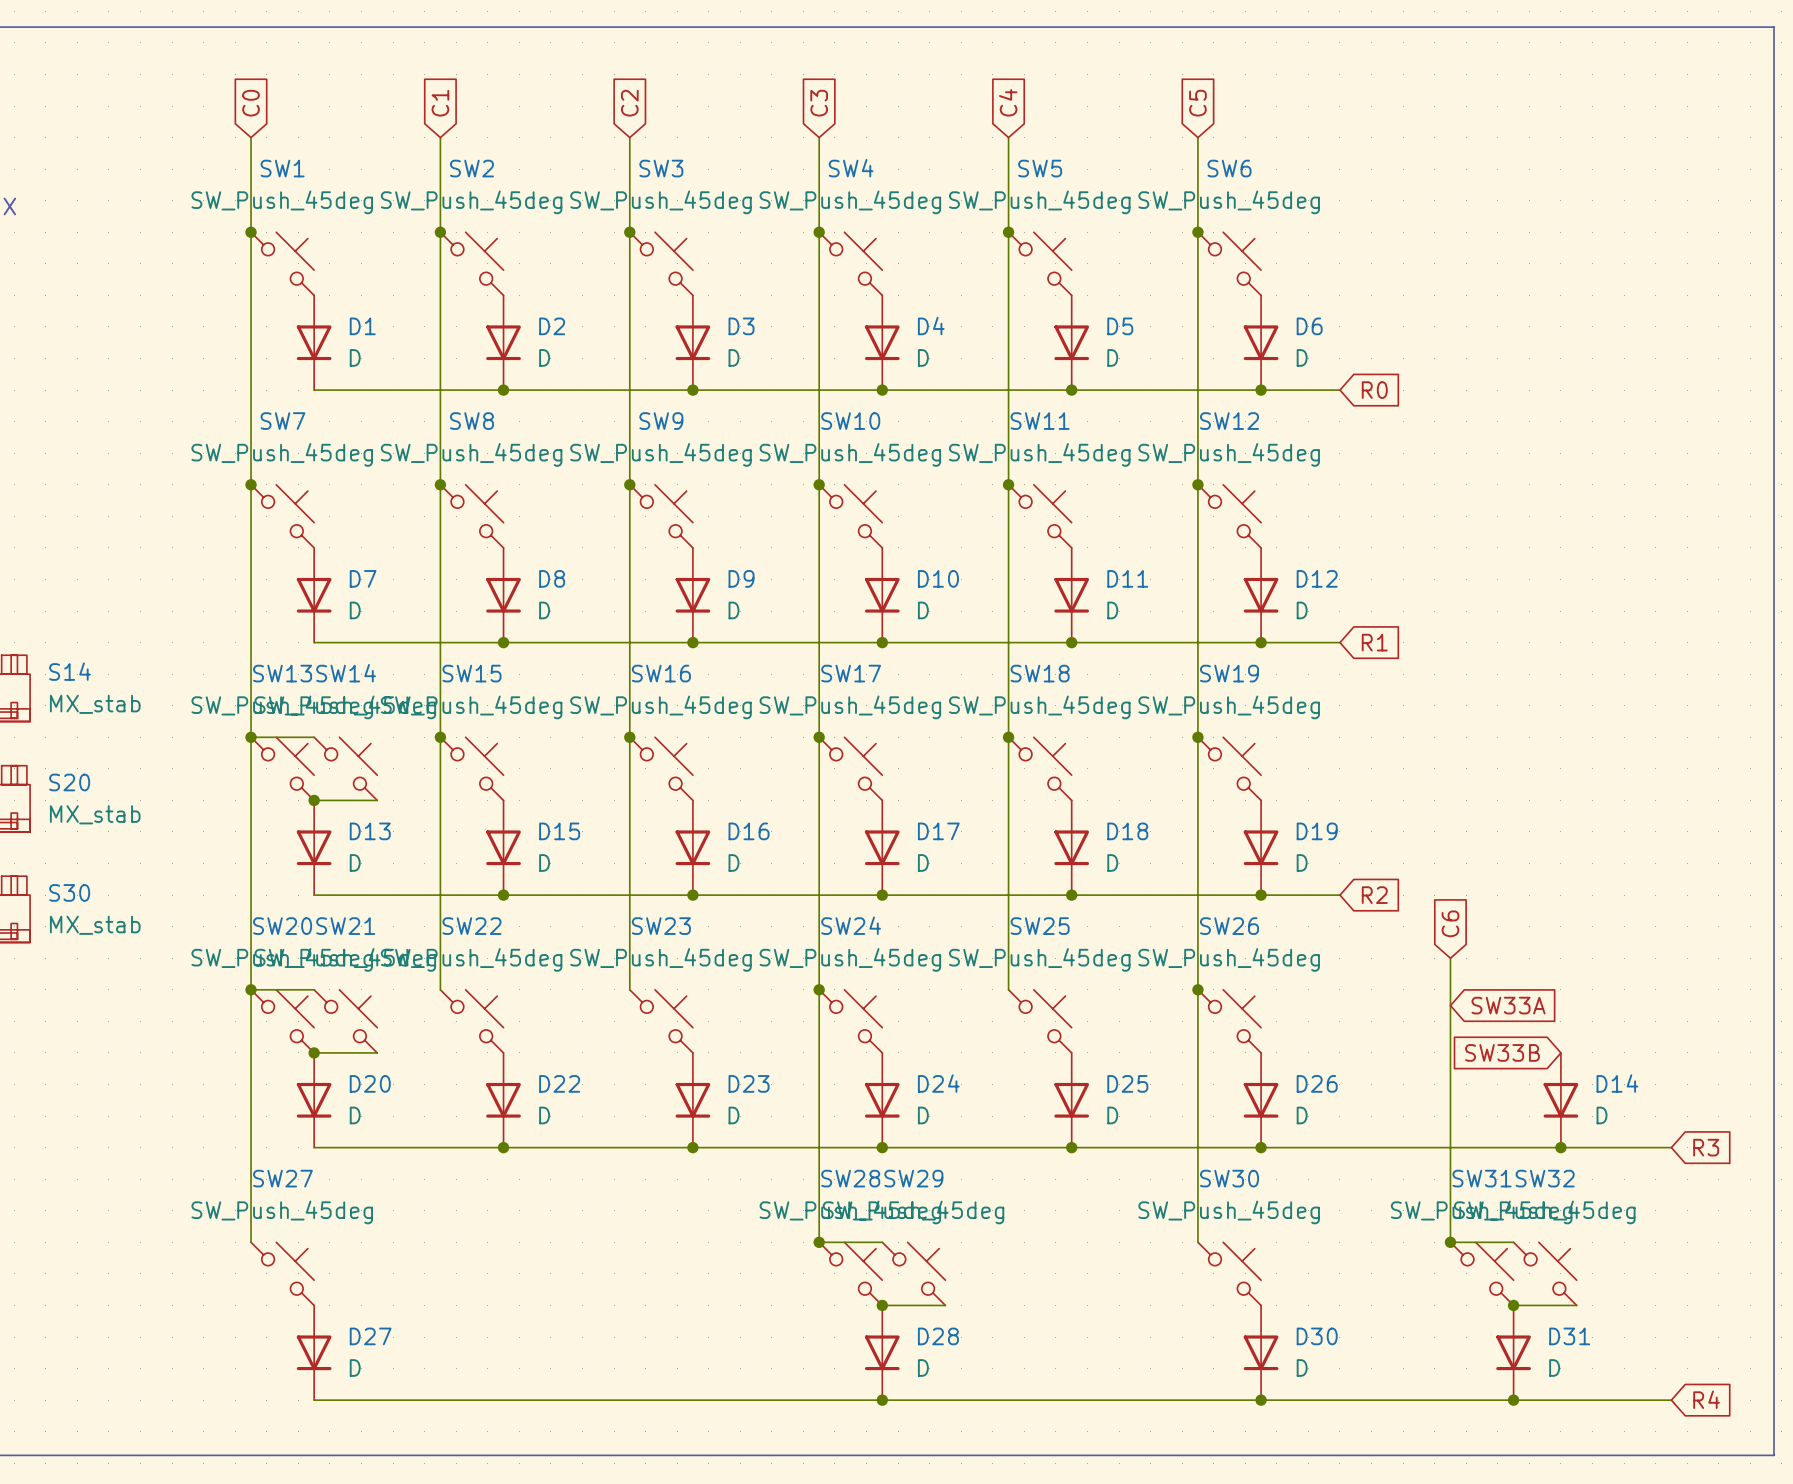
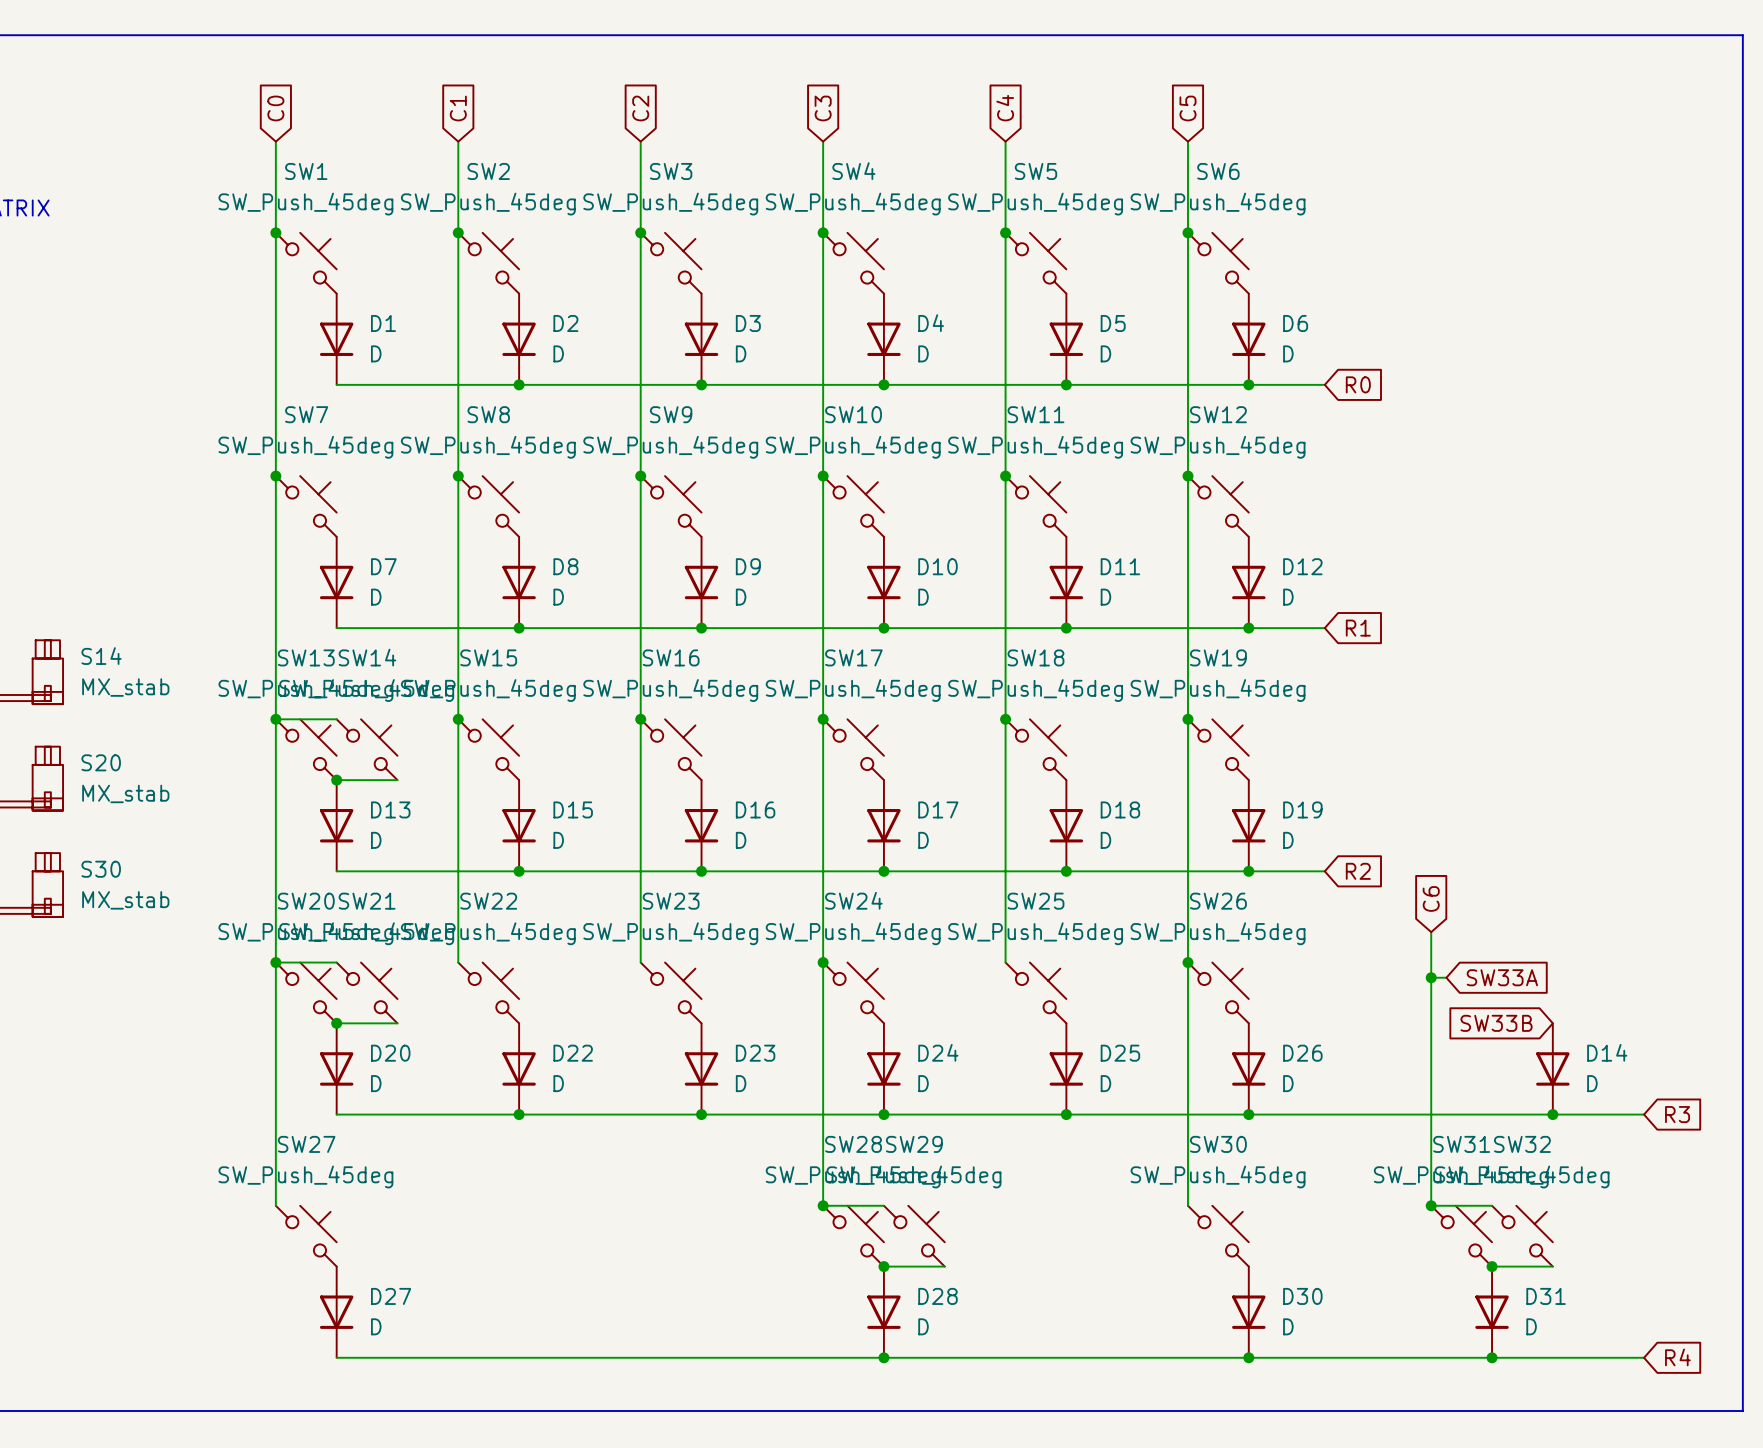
wire: none -> (1431, 977) (1446, 977)
junction: none -> (1431, 977)
global label position: SW33A (1508, 1005) -> SW33A (1502, 977)
global label position: SW33B (1502, 1052) -> SW33B (1496, 1023)
D14 position: (1560, 1100) -> (1552, 1068)
junction position: (1560, 1147) -> (1552, 1114)

